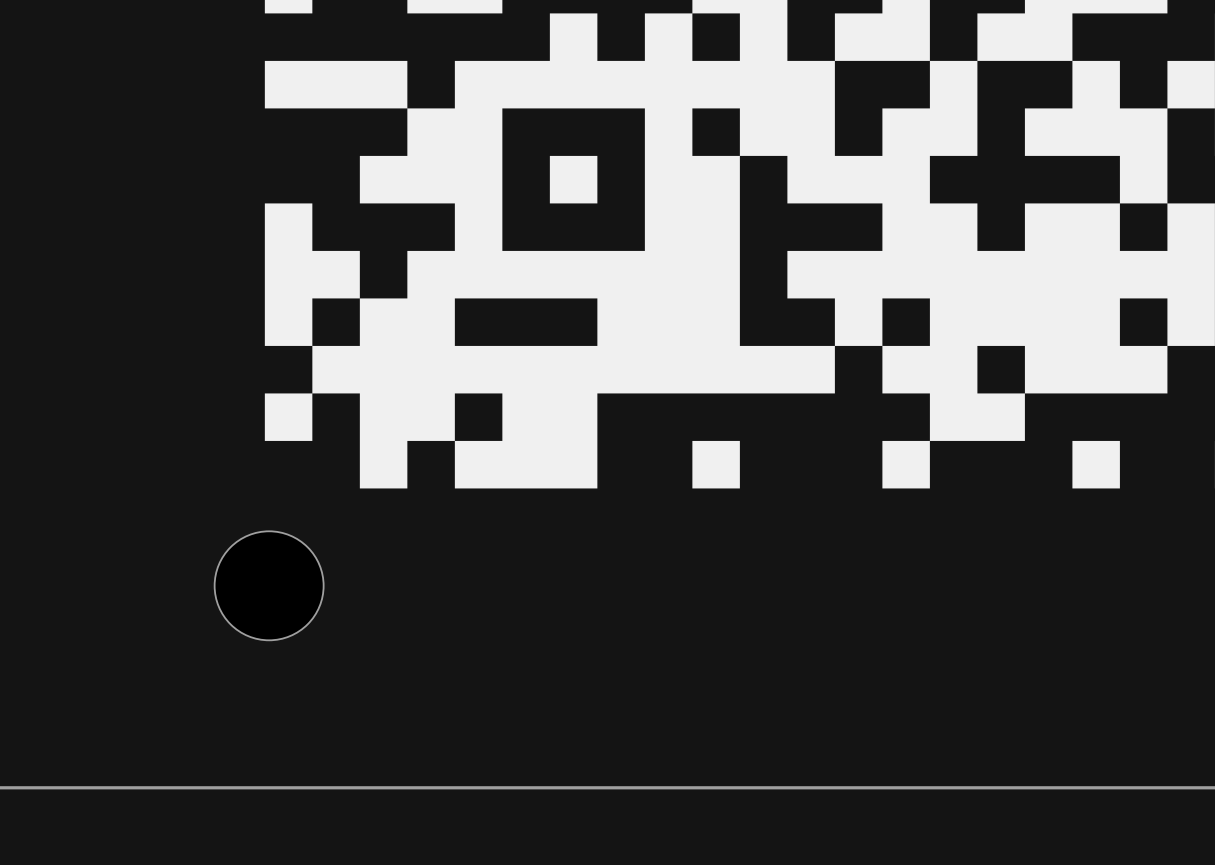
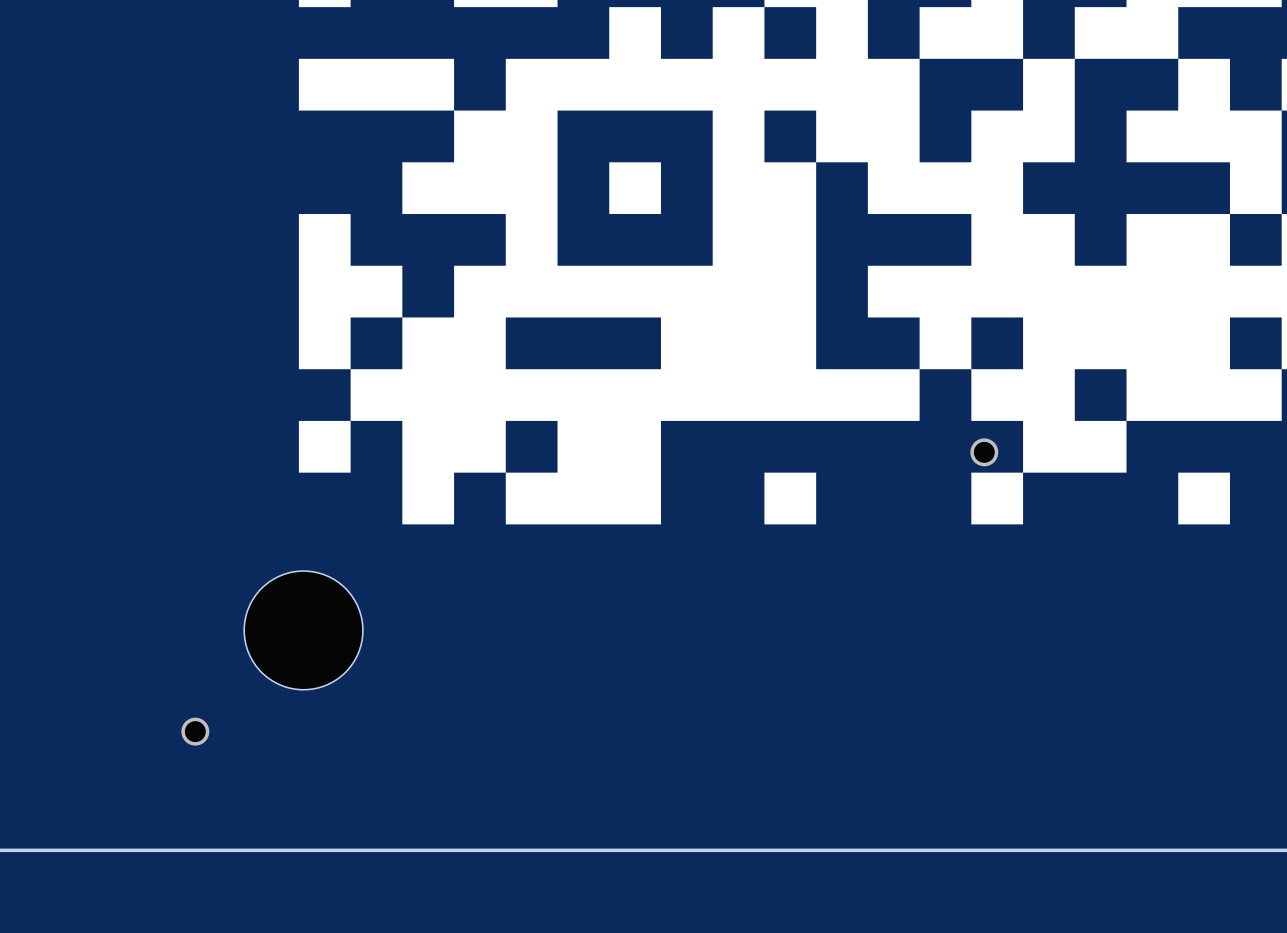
via: none -> (984, 452)
via: none -> (195, 731)

